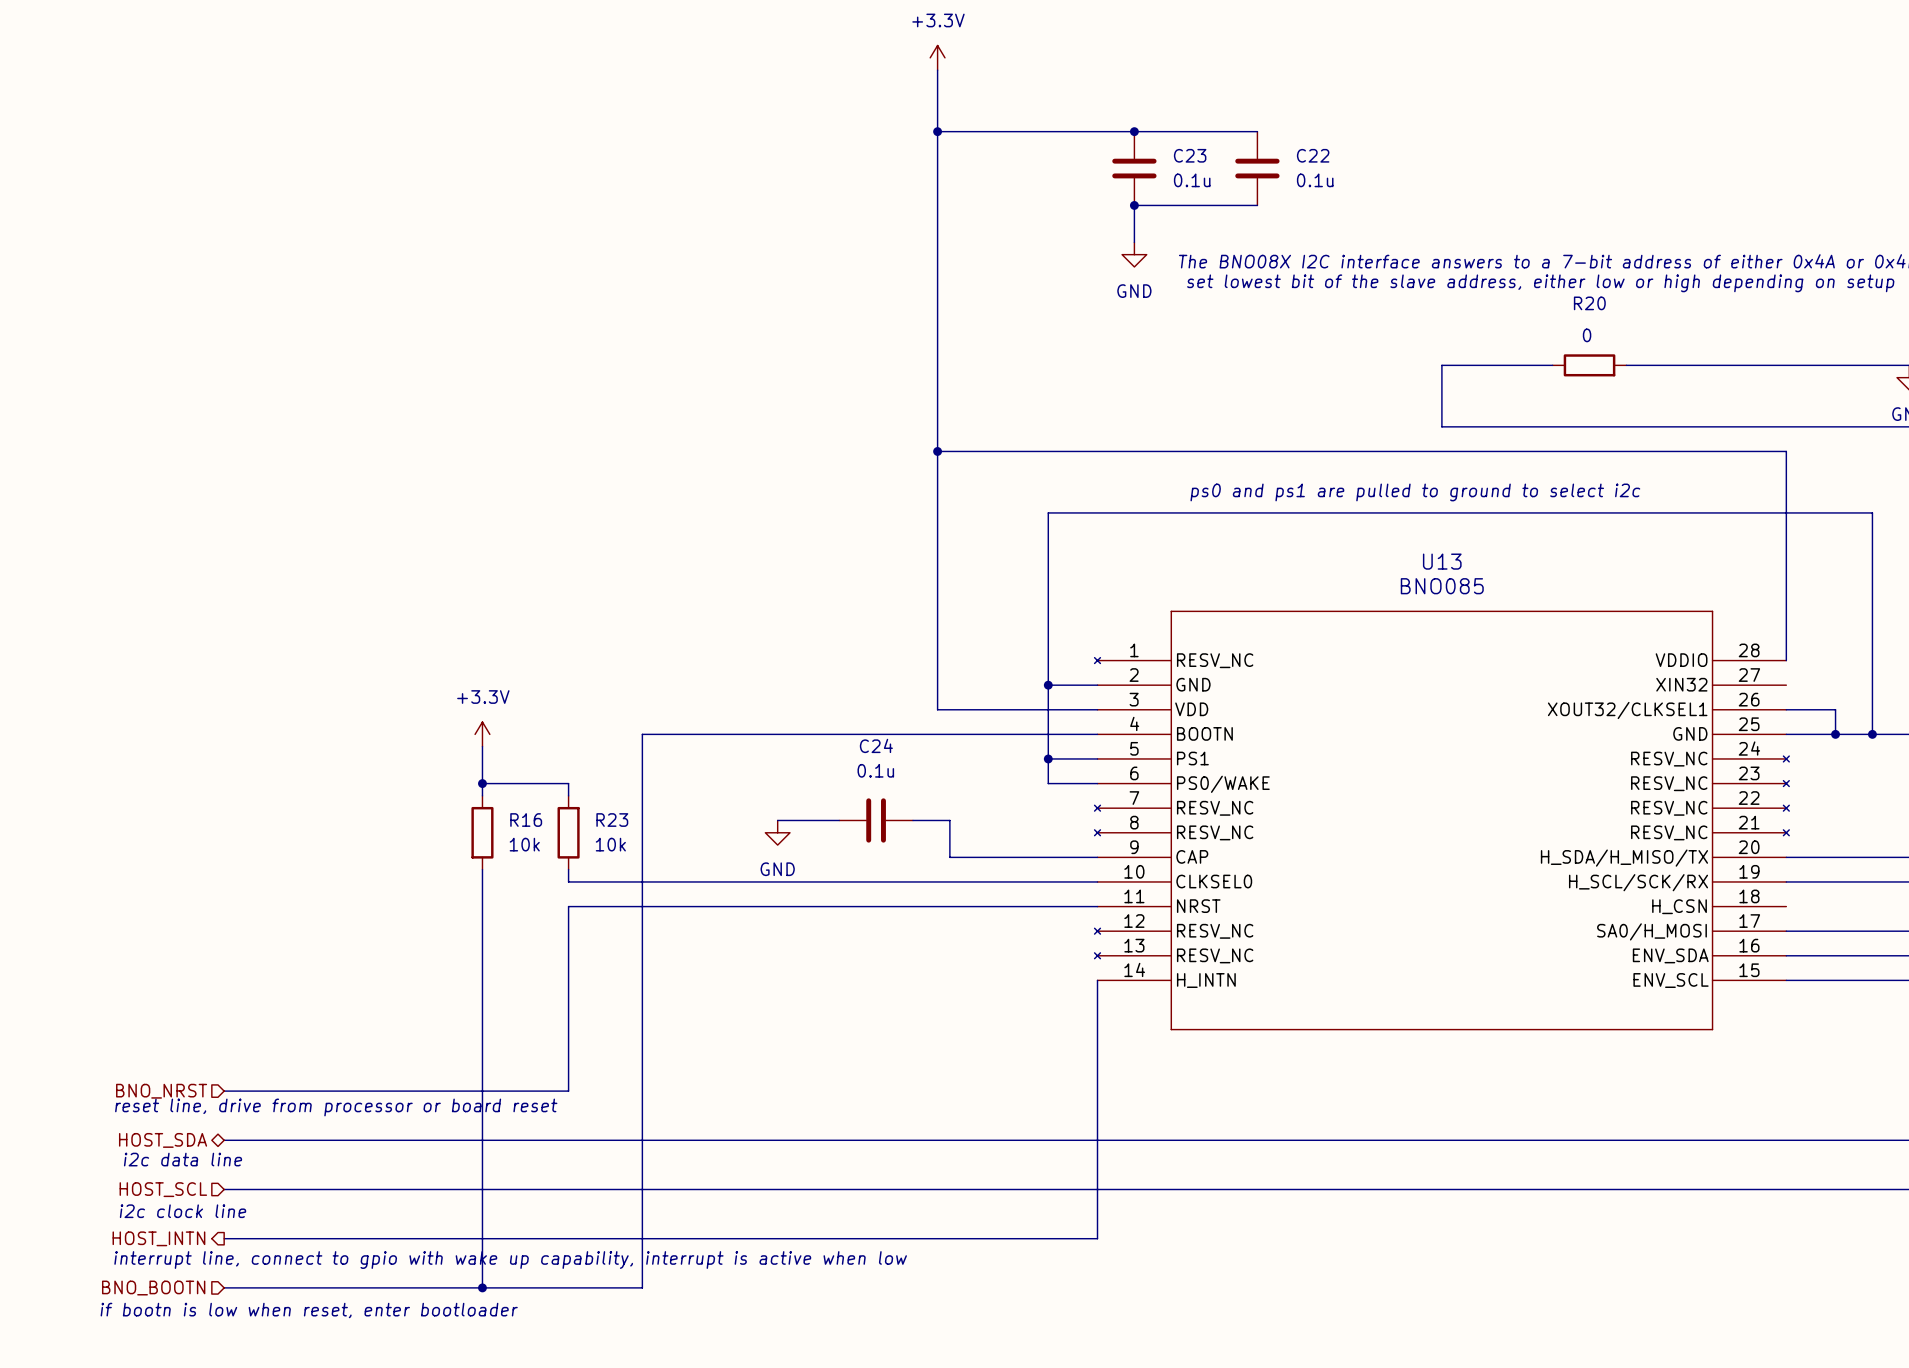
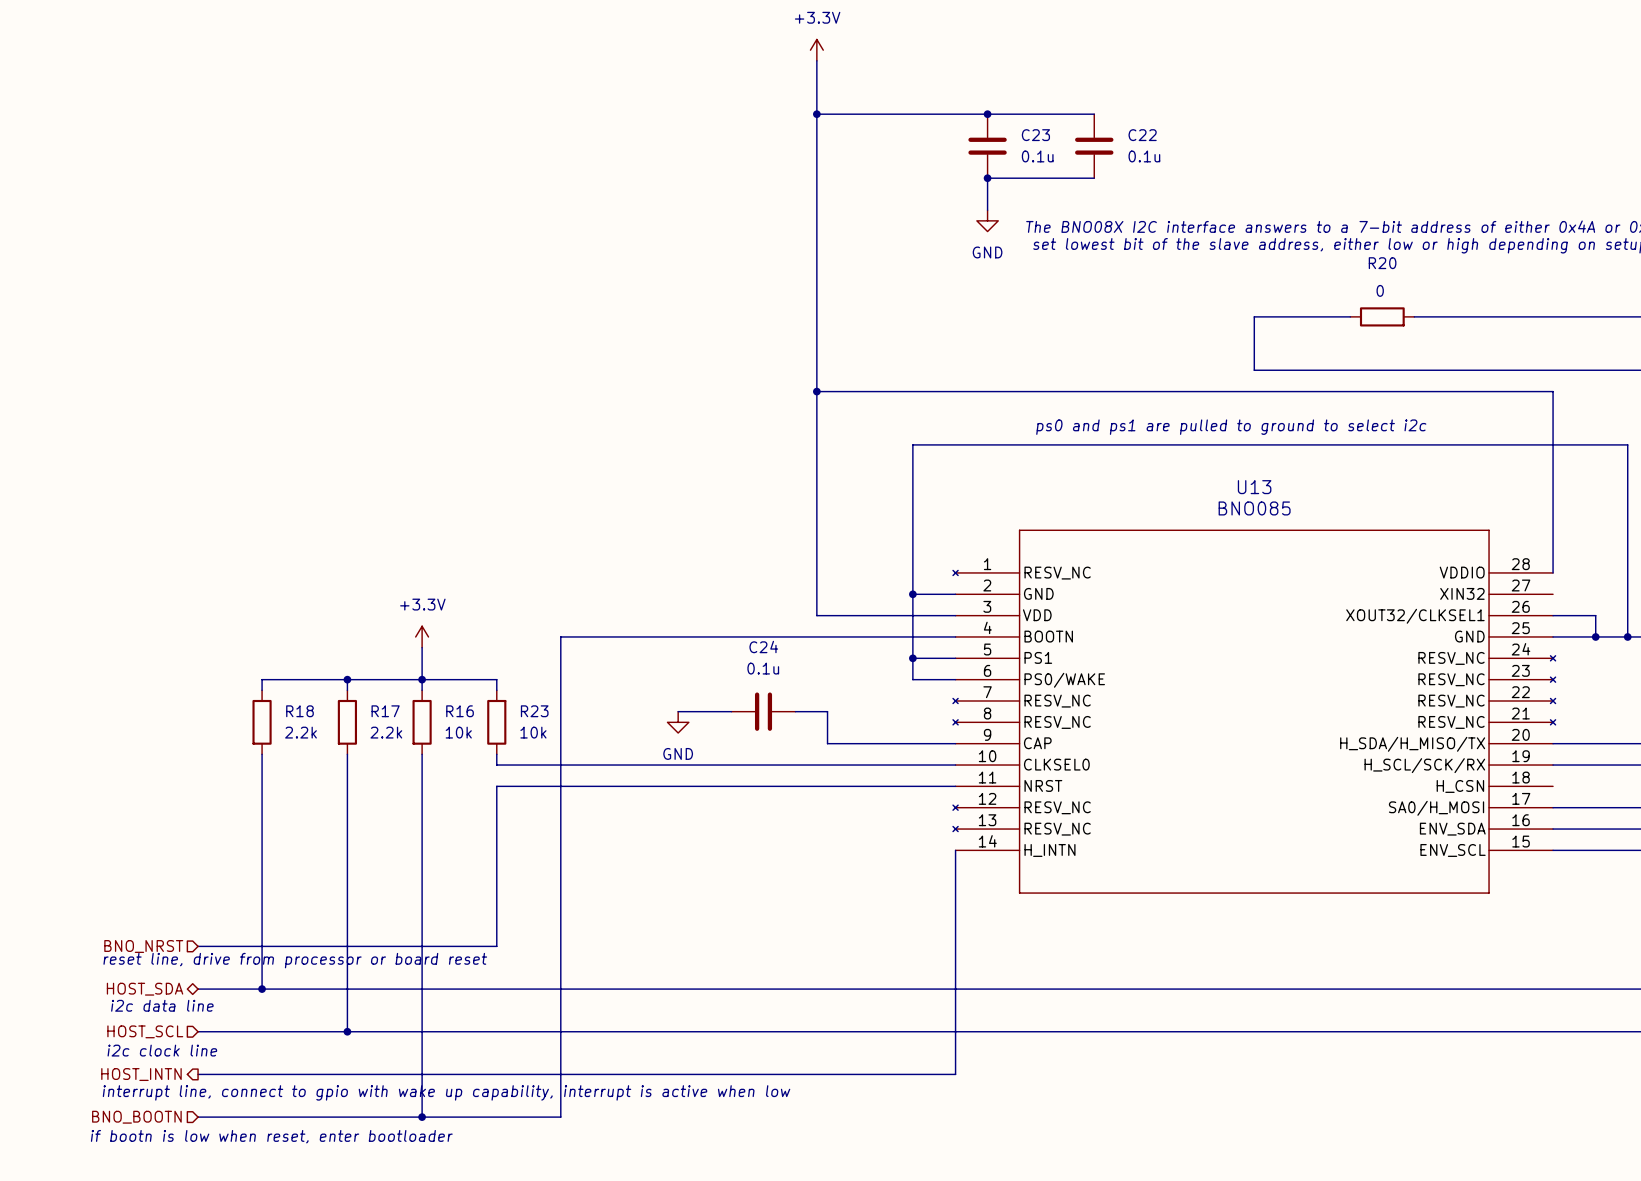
wire: none -> (347, 679) (347, 690)
junction: none -> (347, 679)
wire: none -> (422, 679) (262, 679) (262, 690)
R18: none -> 2.2k (262, 722)
R17: none -> 2.2k (347, 722)
wire: none -> (262, 754) (262, 989)
wire: none -> (347, 754) (347, 1031)
junction: none -> (262, 989)
junction: none -> (347, 1031)

